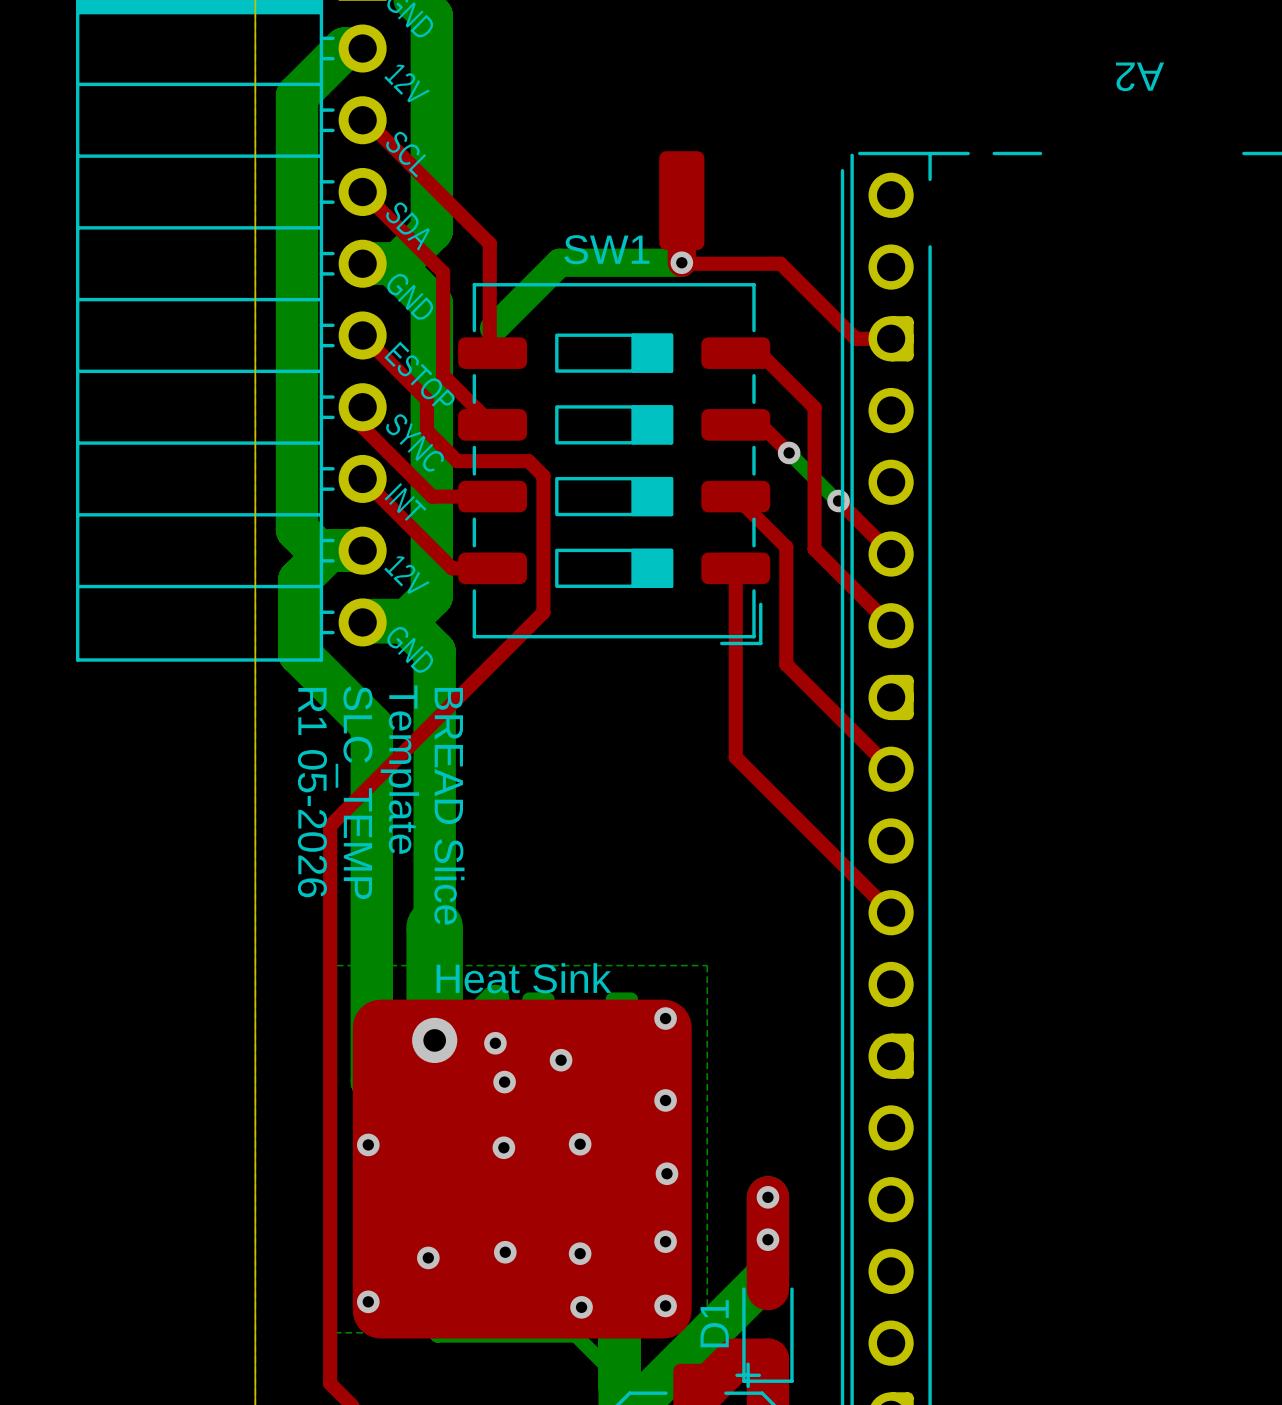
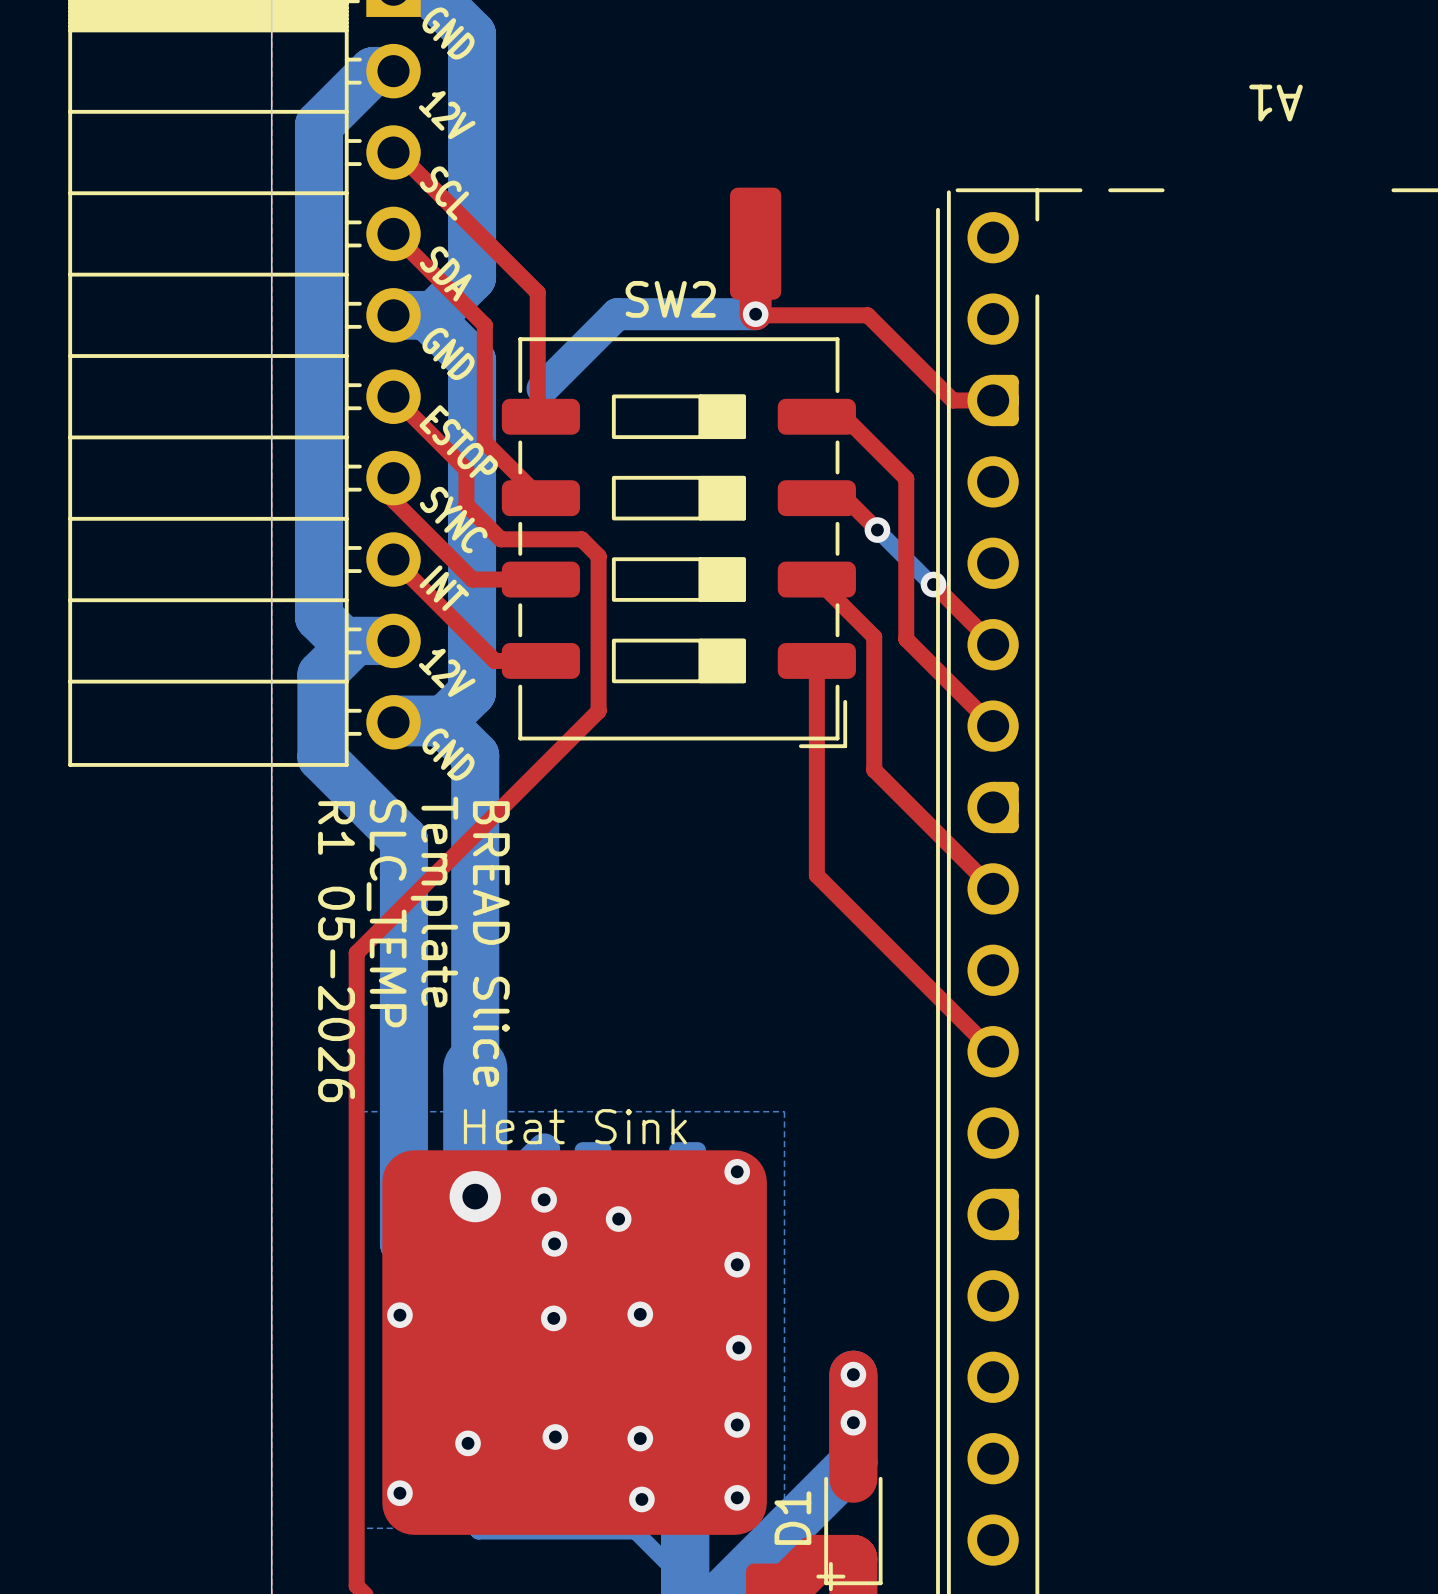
A2 name: A2 (1140, 76) -> A1 (1276, 103)
SW1 name: SW1 (606, 249) -> SW2 (670, 299)

